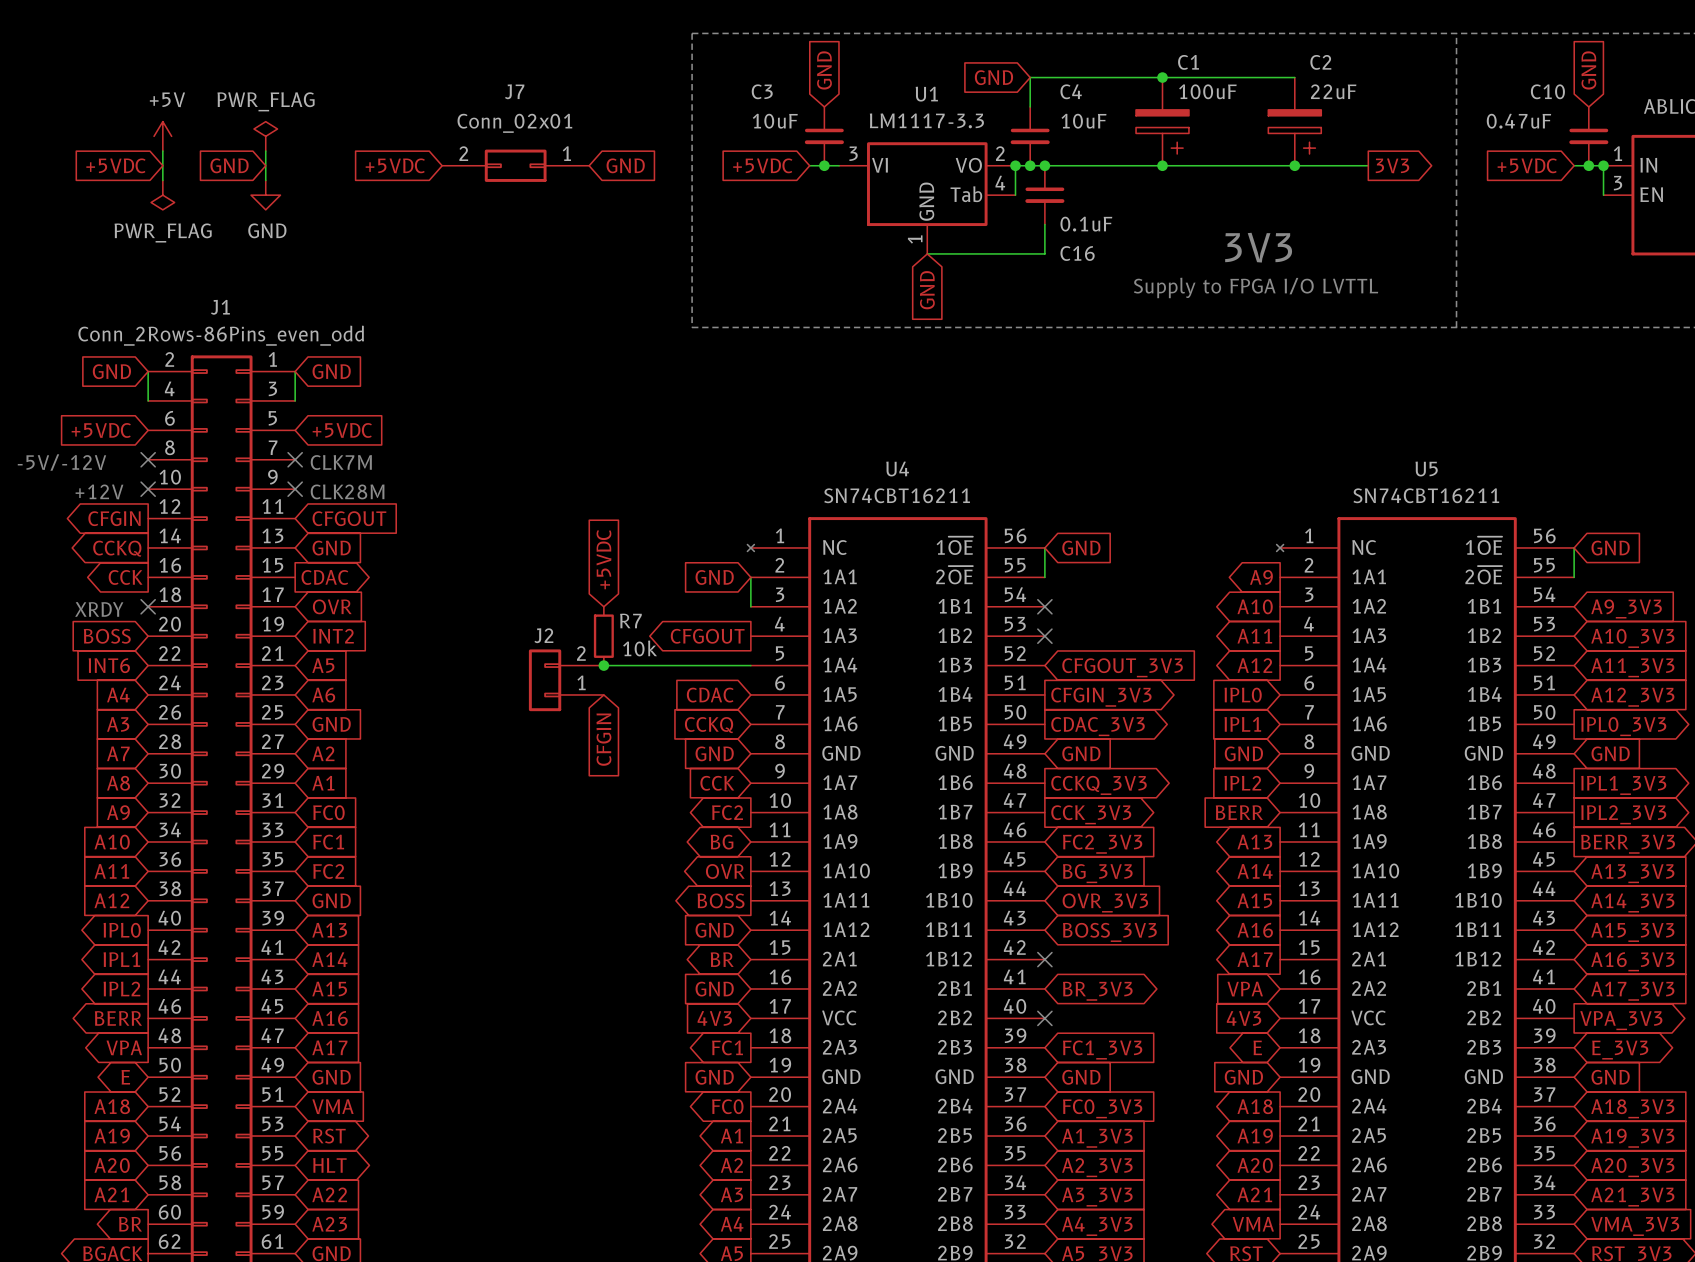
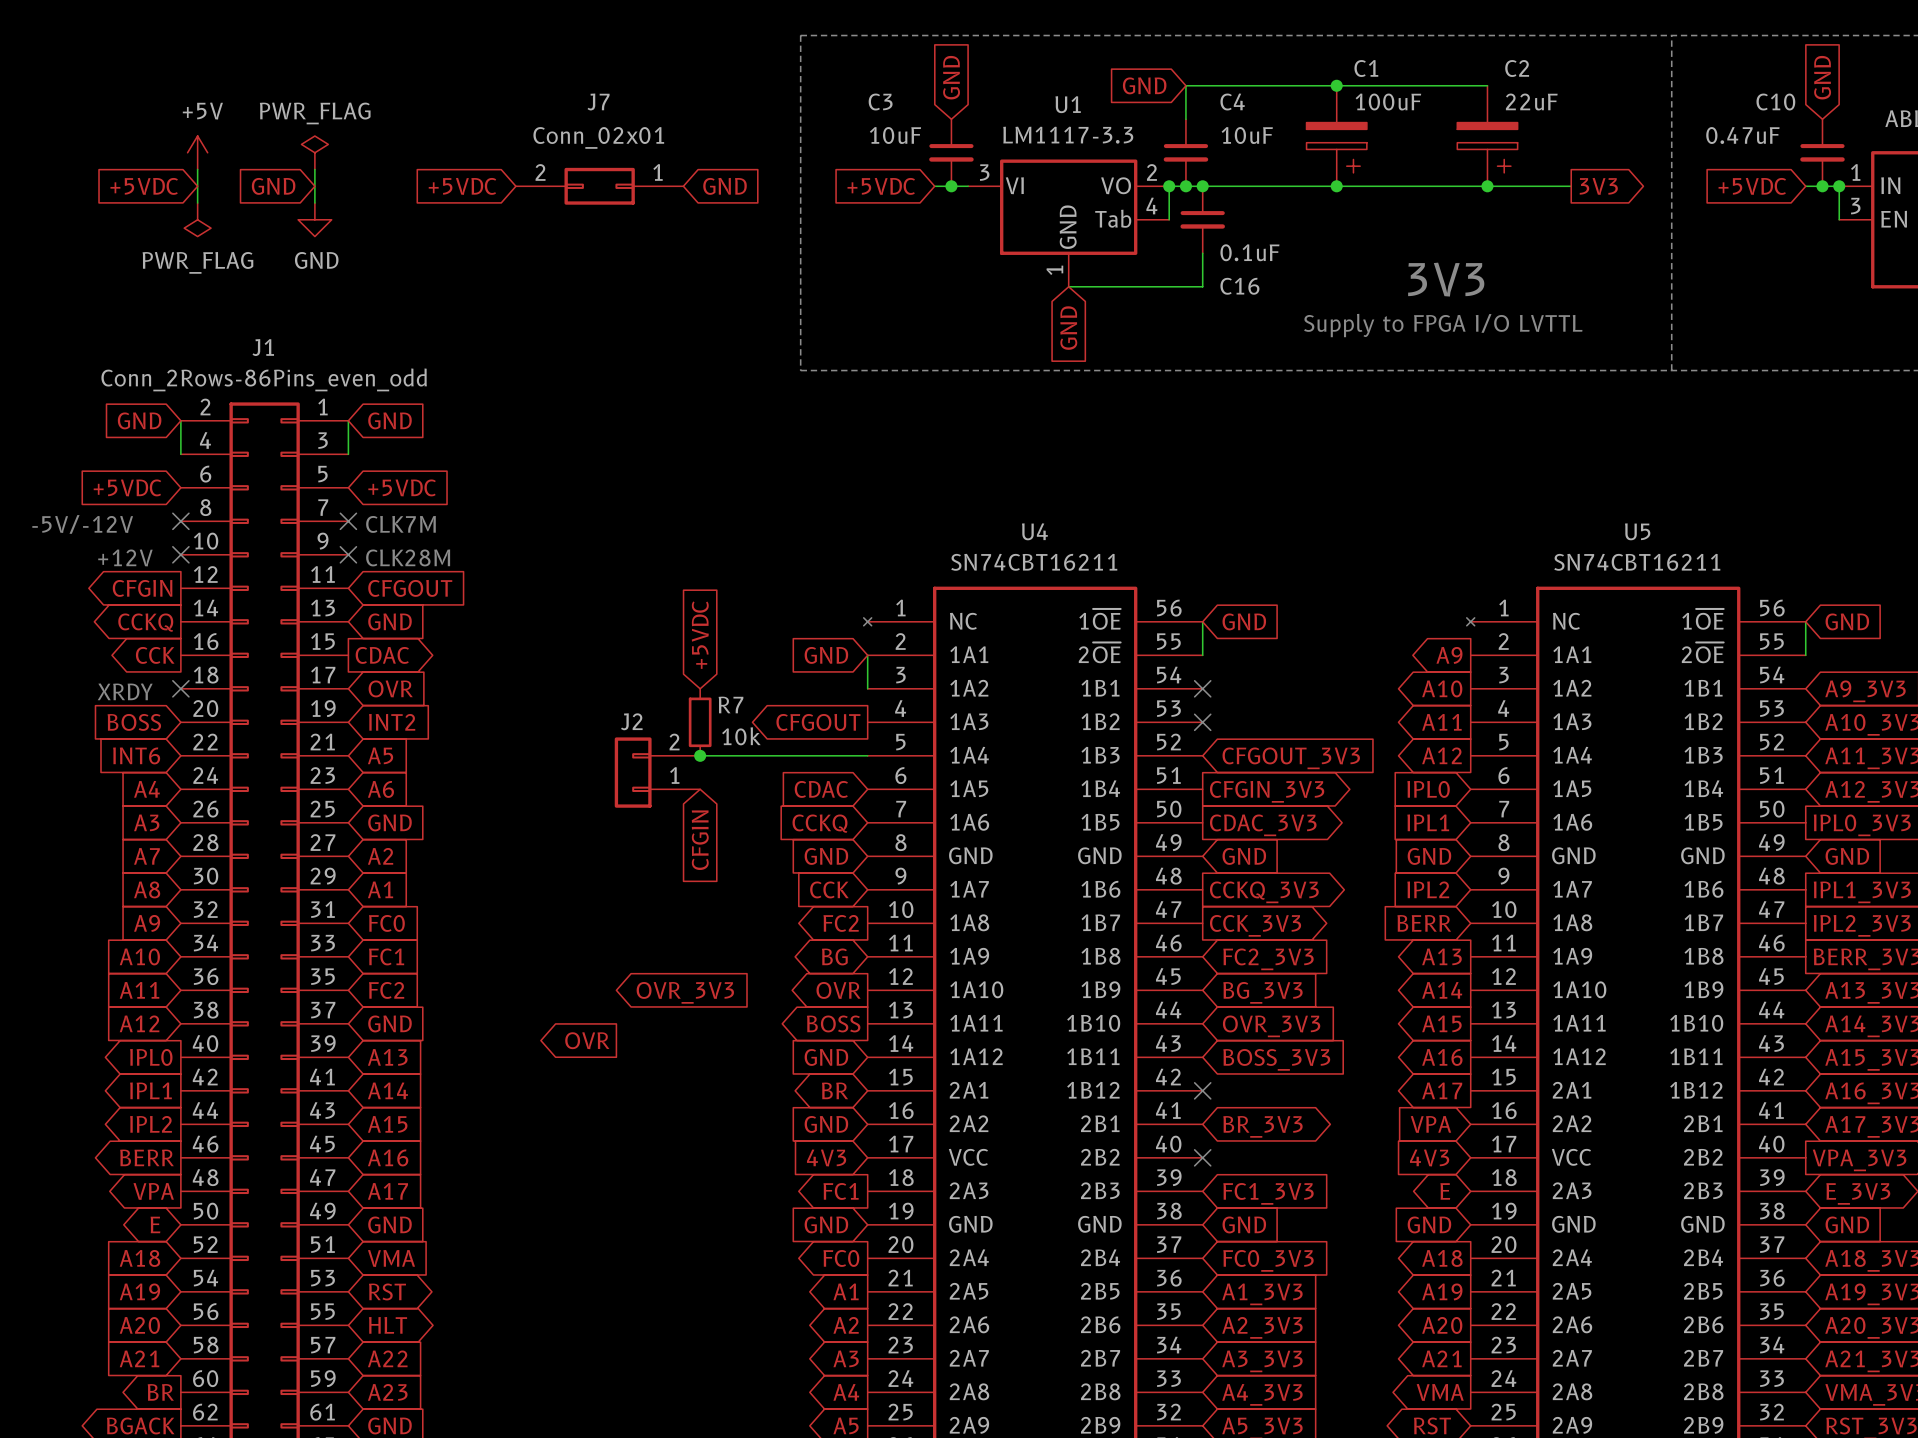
global label: none -> OVR_3V3 (685, 992)
global label: none -> OVR (587, 1040)

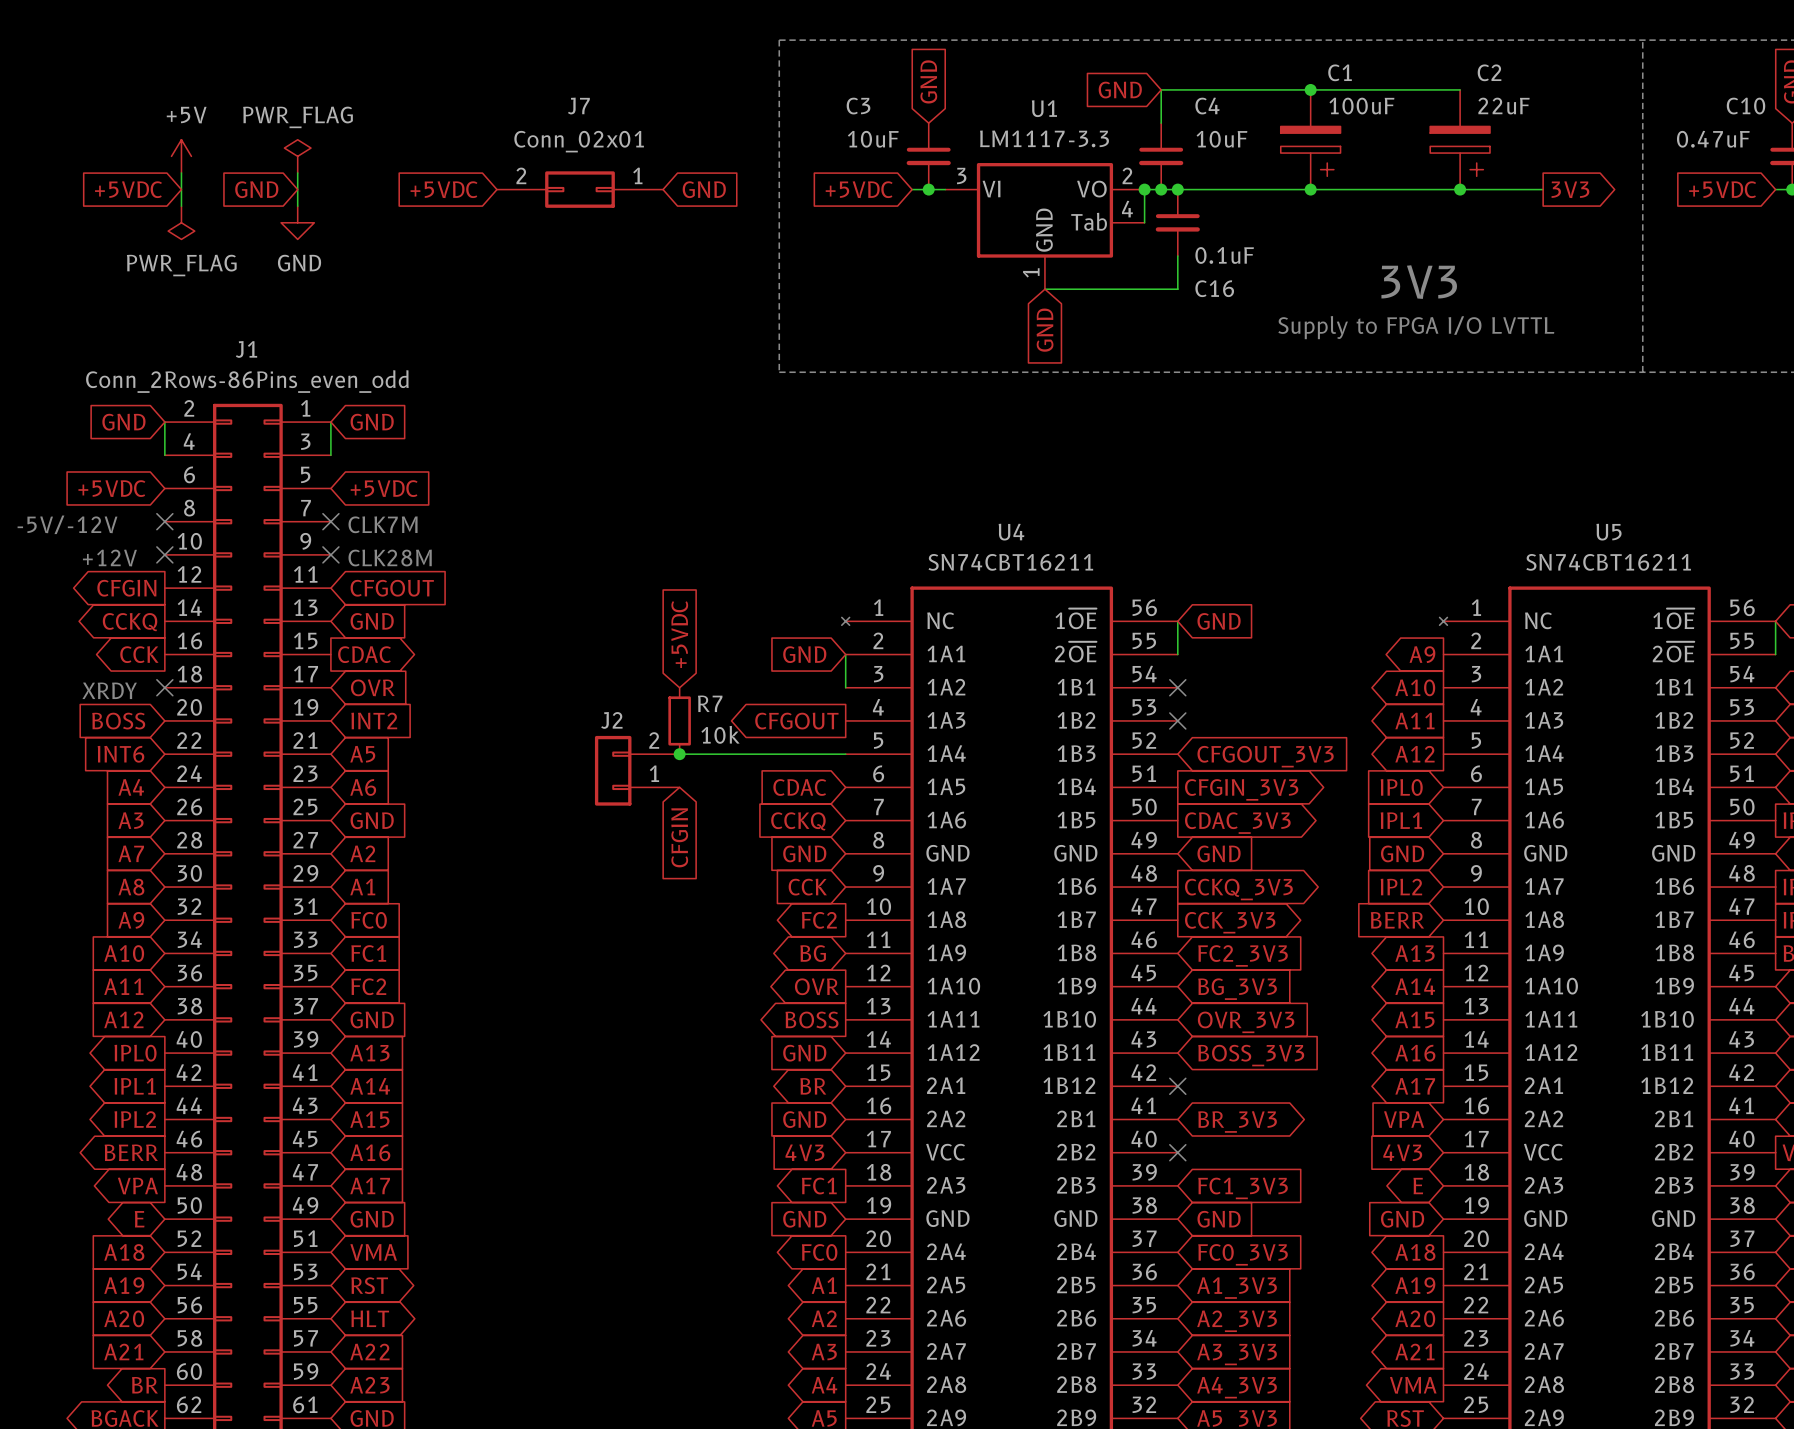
global label: OVR_3V3 (685, 992) -> none
global label: OVR (587, 1040) -> none

